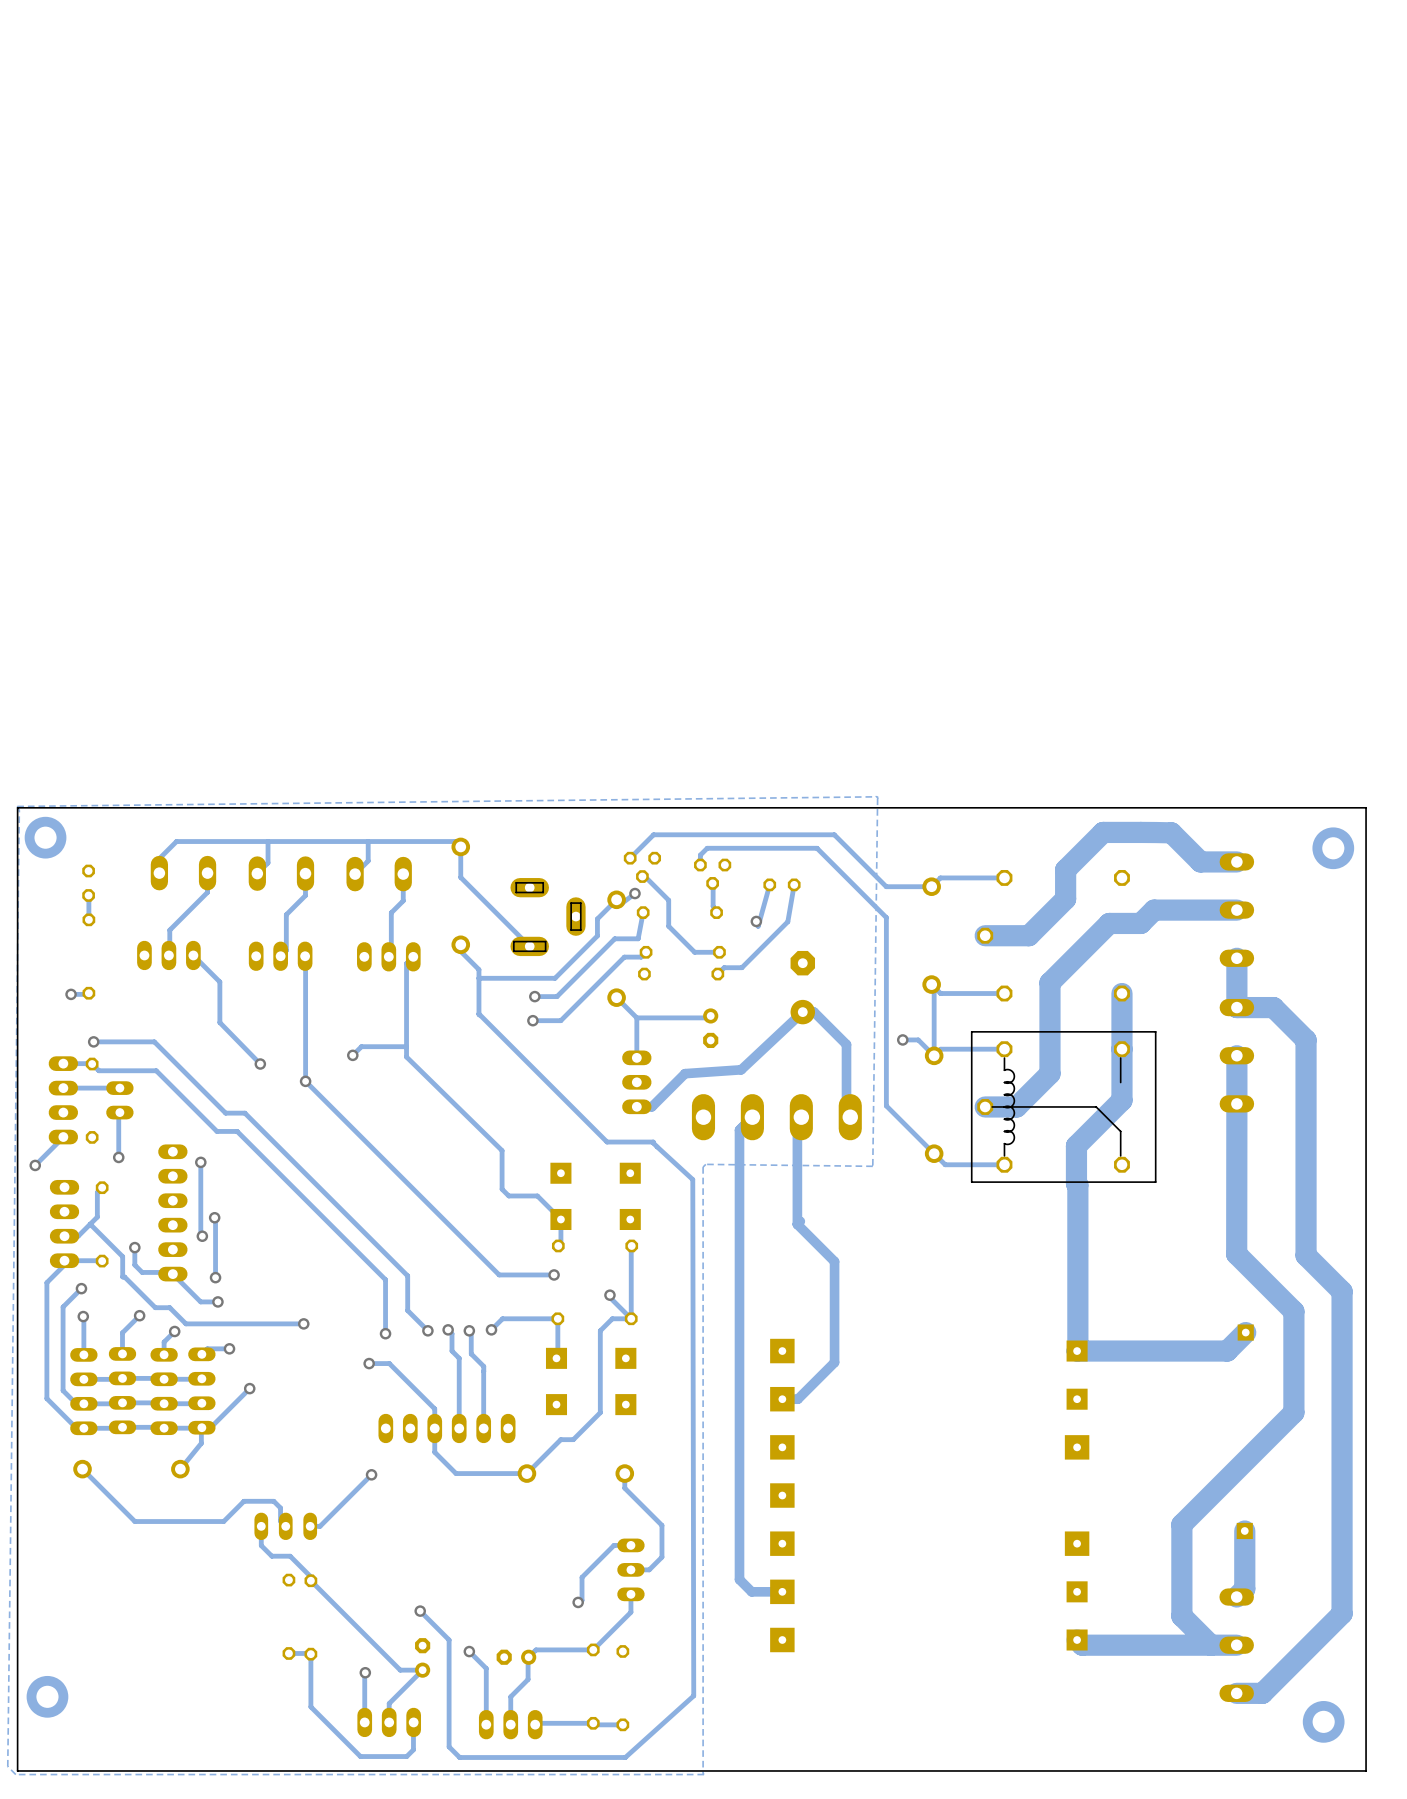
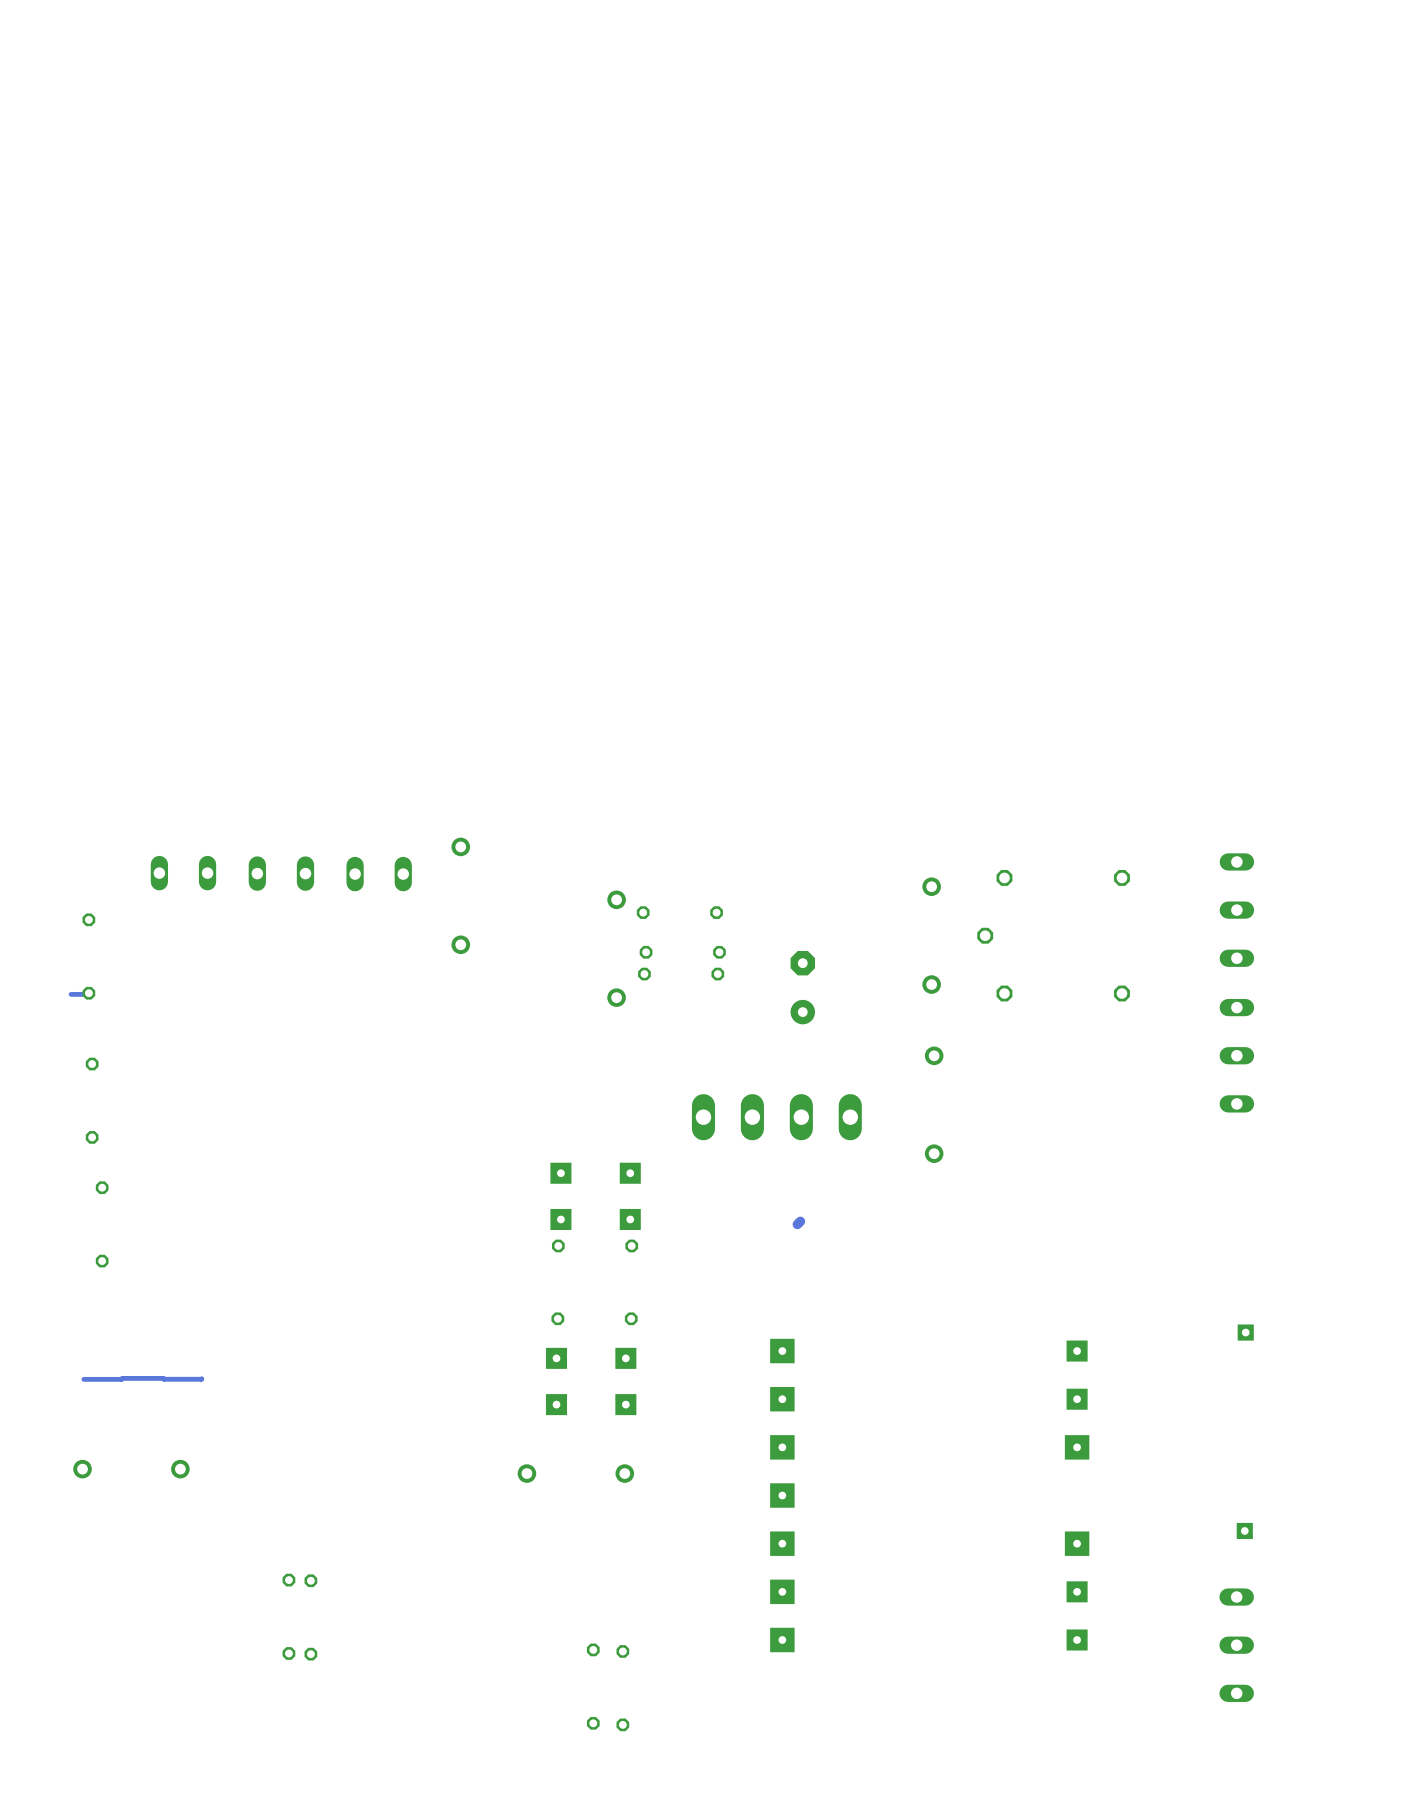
zone outline: (876, 796) (17, 806) (19, 810) (7, 1766) (15, 1774) (704, 1774) (703, 1167) (705, 1164) (872, 1166) (878, 797) (876, 796) -> none
board edge: (1366, 807) (17, 807) (17, 1770) (1366, 1770) (1366, 807) -> none
drawing: [24, 816, 67, 859] -> none
drawing: [1312, 827, 1355, 870] -> none
track: (268, 841) (268, 862) (257, 873) -> none
track: (368, 841) (368, 860) (355, 874) -> none
track: (630, 858) (653, 834) (834, 834) (886, 886) (931, 886) (940, 877) (1004, 877) -> none
track: (1236, 861) (1200, 861) (1171, 832) (1103, 832) (1065, 869) (1065, 899) (1028, 935) (985, 935) -> none
track: (700, 865) (700, 855) (707, 848) (817, 848) (886, 917) (886, 1105) (945, 1164) (1004, 1164) -> none
part: (642, 867) -> none
track: (159, 873) (159, 858) (176, 841) (455, 841) (460, 846) (460, 877) (529, 946) -> none
track: (207, 873) (207, 892) (169, 930) (168, 955) -> none
track: (305, 873) (305, 895) (286, 914) (286, 950) (280, 956) -> none
track: (403, 874) (403, 900) (391, 912) (391, 954) (388, 956) -> none
part: (712, 874) -> none
track: (642, 876) (644, 876) (668, 900) (668, 926) (694, 952) (719, 952) -> none
part: (88, 883) -> none
track: (713, 883) (713, 906) (716, 912) -> none
track: (769, 884) (758, 926) (756, 921) -> none
part: (781, 884) -> none
track: (794, 884) (787, 921) (741, 967) (724, 967) (717, 974) -> none
track: (635, 893) (620, 904) (616, 899) (597, 918) (597, 935) (555, 978) (478, 978) -> none
via: (635, 893) -> none
track: (88, 895) (88, 919) -> none
track: (1236, 910) (1154, 910) (1140, 923) (1109, 923) (1049, 982) (1049, 1073) (1016, 1106) (985, 1106) -> none
track: (643, 912) (638, 938) (614, 938) (556, 996) (534, 996) -> none
part: (548, 917) -> none
via: (756, 921) -> none
track: (460, 944) (460, 951) (478, 969) (478, 1014) -> none
track: (646, 952) (641, 957) (624, 957) (560, 1020) (532, 1020) -> none
part: (168, 955) -> none
track: (193, 955) (219, 981) (219, 1022) (260, 1064) -> none
part: (280, 956) -> none
track: (305, 956) (305, 1081) (499, 1274) (554, 1274) -> none
part: (388, 956) -> none
track: (413, 956) (406, 963) (406, 1056) (502, 1150) (502, 1189) (508, 1195) (537, 1195) (560, 1219) (560, 1243) (558, 1245) -> none
track: (1236, 958) (1236, 1007) (1273, 1007) (1306, 1040) (1306, 1255) (1342, 1291) (1342, 1613) (1262, 1693) (1236, 1693) -> none
track: (931, 984) (940, 993) (1004, 993) -> none
track: (934, 987) (934, 1055) -> none
track: (1121, 993) (1121, 1100) (1076, 1145) (1077, 1351) (1227, 1351) (1245, 1332) -> none
via: (71, 994) -> none
via: (534, 996) -> none
track: (616, 997) (636, 1017) -> none
track: (478, 1013) (607, 1142) (653, 1142) (692, 1179) (693, 1695) (625, 1757) (459, 1757) (449, 1746) (449, 1639) (420, 1611) -> none
track: (710, 1015) (708, 1017) (636, 1017) -> none
track: (636, 1017) (636, 1057) -> none
via: (532, 1020) -> none
part: (710, 1028) -> none
track: (902, 1039) (918, 1039) (934, 1055) -> none
via: (902, 1039) -> none
track: (93, 1041) (154, 1041) (225, 1113) (244, 1113) (407, 1275) (407, 1310) (427, 1330) -> none
via: (93, 1041) -> none
track: (406, 1046) (361, 1046) (352, 1055) -> none
track: (1004, 1049) (940, 1049) (934, 1055) -> none
via: (352, 1055) -> none
track: (1236, 1055) (1236, 1254) (1293, 1311) (1293, 1412) (1181, 1524) (1181, 1616) (1210, 1645) -> none
track: (63, 1063) (91, 1063) (98, 1070) (156, 1070) (216, 1131) (237, 1131) (385, 1279) (385, 1333) -> none
via: (260, 1064) -> none
via: (305, 1081) -> none
part: (636, 1082) -> none
track: (119, 1088) (63, 1088) -> none
part: (63, 1100) -> none
part: (119, 1100) -> none
track: (636, 1106) (651, 1106) (685, 1073) (741, 1069) (802, 1012) (814, 1012) (846, 1044) (846, 1113) (850, 1117) -> none
part: (1063, 1106) -> none
track: (119, 1112) (118, 1157) -> none
track: (752, 1117) (739, 1130) (739, 1579) (751, 1591) (782, 1591) -> none
track: (801, 1117) (797, 1121) (797, 1224) (834, 1261) (834, 1362) (797, 1399) (782, 1399) -> none
track: (63, 1137) (35, 1165) -> none
via: (118, 1157) -> none
track: (200, 1162) (200, 1234) (202, 1236) -> none
via: (200, 1162) -> none
via: (35, 1165) -> none
track: (102, 1187) (97, 1192) (97, 1217) (78, 1236) (64, 1236) -> none
part: (172, 1212) -> none
track: (214, 1217) (215, 1277) -> none
via: (214, 1217) -> none
part: (64, 1224) -> none
track: (90, 1224) (122, 1256) (122, 1276) (155, 1307) (169, 1307) (185, 1323) (303, 1323) -> none
via: (202, 1236) -> none
track: (631, 1245) (631, 1318) -> none
track: (134, 1247) (134, 1265) (142, 1272) (171, 1272) (200, 1301) (217, 1301) -> none
via: (134, 1247) -> none
track: (102, 1261) (64, 1260) (64, 1265) (46, 1282) (46, 1398) (76, 1428) (201, 1428) -> none
via: (554, 1274) -> none
via: (215, 1277) -> none
track: (81, 1288) (63, 1307) (63, 1390) (76, 1403) (201, 1403) -> none
via: (81, 1288) -> none
track: (609, 1295) (609, 1297) (631, 1318) -> none
via: (609, 1295) -> none
via: (217, 1301) -> none
track: (139, 1315) (122, 1332) (122, 1353) -> none
via: (139, 1315) -> none
track: (83, 1316) (83, 1354) -> none
via: (83, 1316) -> none
track: (631, 1318) (612, 1318) (600, 1330) (600, 1412) (573, 1439) (560, 1439) (526, 1473) (456, 1473) (434, 1452) (434, 1408) (389, 1363) (369, 1363) -> none
via: (303, 1323) -> none
track: (448, 1329) (451, 1333) (451, 1351) (459, 1358) (459, 1428) -> none
via: (448, 1329) -> none
track: (491, 1329) (502, 1318) (557, 1318) (556, 1358) -> none
via: (491, 1329) -> none
via: (427, 1330) -> none
track: (469, 1330) (471, 1332) (471, 1353) (483, 1366) (483, 1371) -> none
via: (469, 1330) -> none
track: (174, 1331) (164, 1342) (164, 1354) -> none
via: (174, 1331) -> none
via: (385, 1333) -> none
track: (229, 1348) (207, 1348) (201, 1354) -> none
via: (229, 1348) -> none
via: (369, 1363) -> none
track: (483, 1371) (483, 1428) -> none
track: (249, 1388) (210, 1427) (201, 1428) -> none
via: (249, 1388) -> none
part: (122, 1390) -> none
part: (83, 1391) -> none
part: (164, 1391) -> none
part: (201, 1391) -> none
track: (201, 1428) (201, 1443) (180, 1469) -> none
part: (446, 1428) -> none
track: (82, 1469) (134, 1521) (223, 1521) (243, 1501) (273, 1501) (280, 1508) (280, 1521) (285, 1526) -> none
track: (624, 1473) (624, 1488) (661, 1525) (661, 1557) (649, 1569) (630, 1569) -> none
track: (371, 1474) (320, 1526) (310, 1526) -> none
via: (371, 1474) -> none
track: (261, 1526) (261, 1545) (271, 1556) (290, 1556) (310, 1576) (310, 1580) (400, 1670) (422, 1670) (389, 1703) (389, 1722) -> none
part: (285, 1526) -> none
track: (1244, 1530) (1244, 1588) (1236, 1597) -> none
track: (630, 1545) (614, 1545) (582, 1577) (582, 1600) (578, 1602) -> none
part: (630, 1569) -> none
track: (630, 1594) (630, 1612) (593, 1649) (535, 1649) (528, 1657) (528, 1679) (510, 1696) (510, 1724) -> none
via: (578, 1602) -> none
via: (420, 1611) -> none
track: (1077, 1639) (1082, 1645) (1236, 1645) -> none
track: (469, 1651) (486, 1668) (486, 1724) -> none
via: (469, 1651) -> none
track: (288, 1653) (310, 1654) (310, 1706) (360, 1756) (406, 1756) (413, 1749) (413, 1722) -> none
part: (422, 1657) -> none
part: (516, 1657) -> none
track: (365, 1672) (364, 1722) -> none
via: (365, 1672) -> none
drawing: [26, 1675, 69, 1718] -> none
drawing: [1302, 1701, 1345, 1743] -> none
part: (389, 1722) -> none
part: (510, 1724) -> none
track: (535, 1724) (622, 1724) -> none

